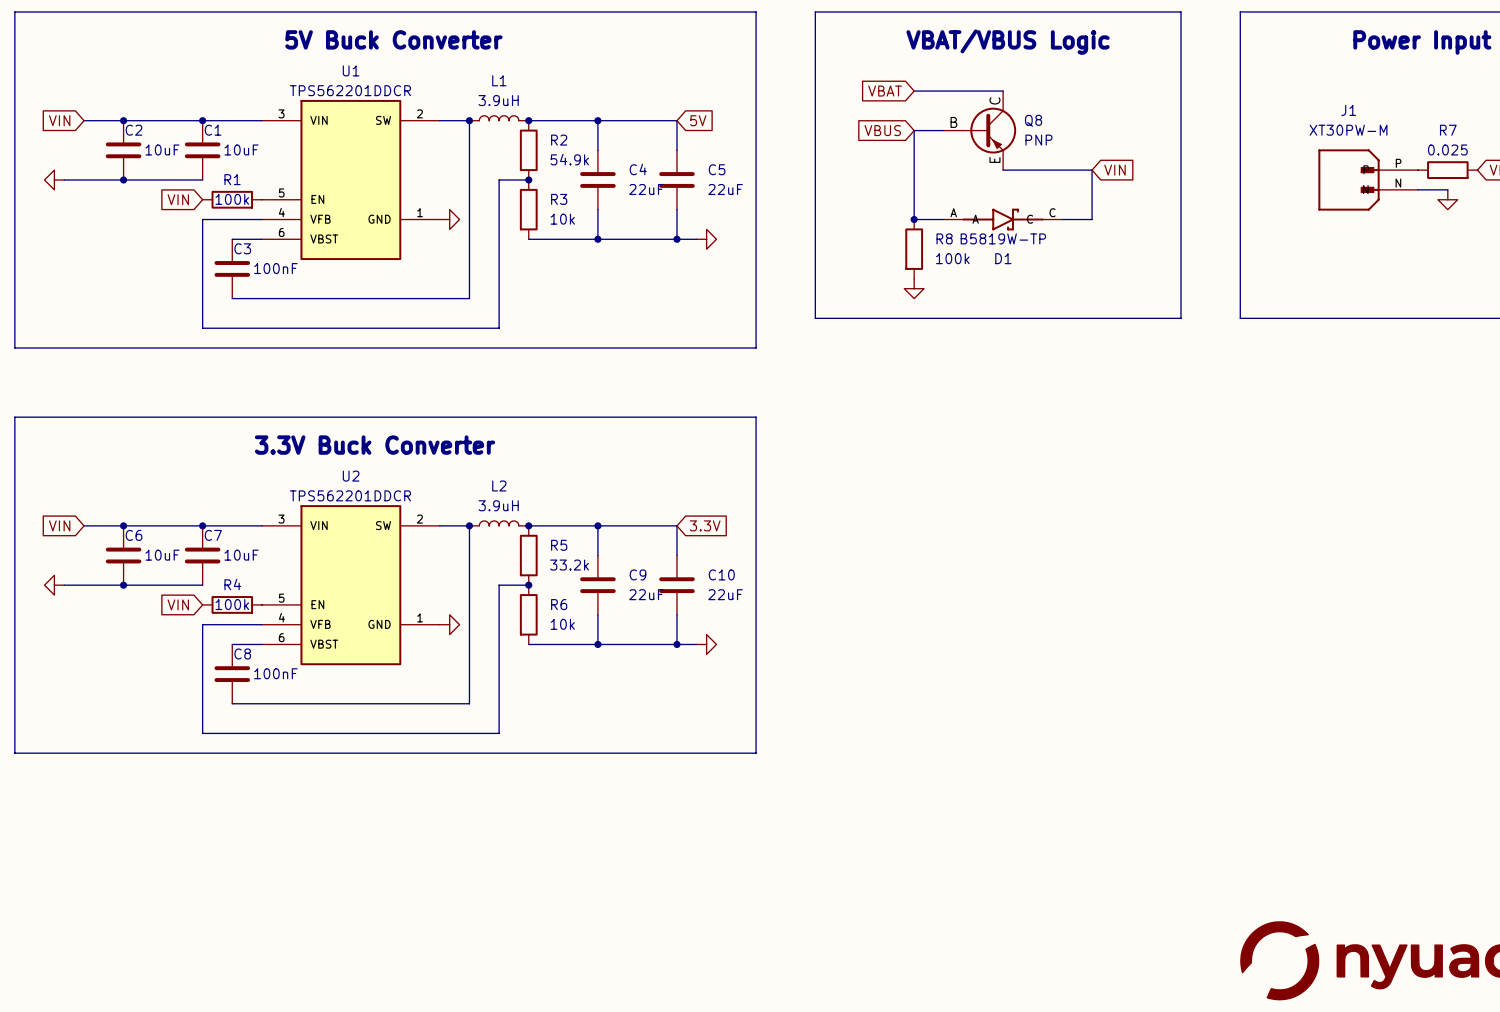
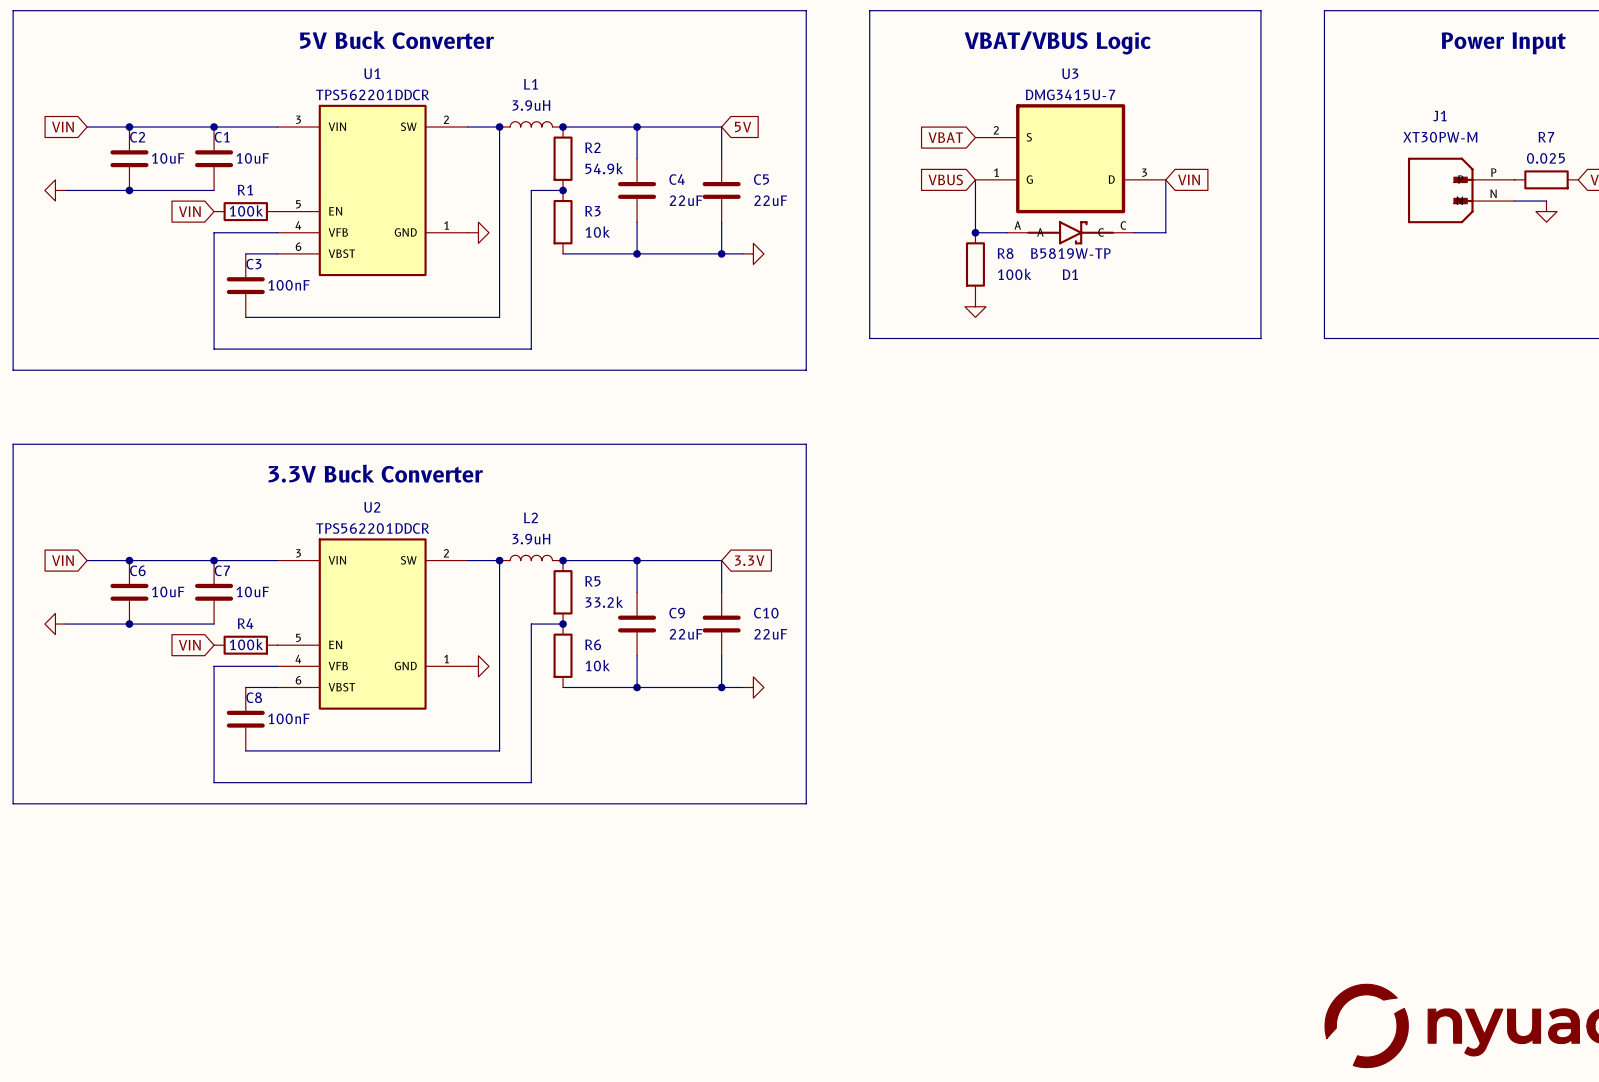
global label: VBAT (885, 91) -> none
wire: (914, 91) (1003, 91) -> none
global label: VBUS (882, 130) -> VBAT (945, 137)
wire: (943, 130) (914, 130) (914, 170) -> none
Q8: PNP (979, 130) -> none
U3: none -> DMG3415U-7 (1070, 158)
global label: none -> VBUS (945, 179)

